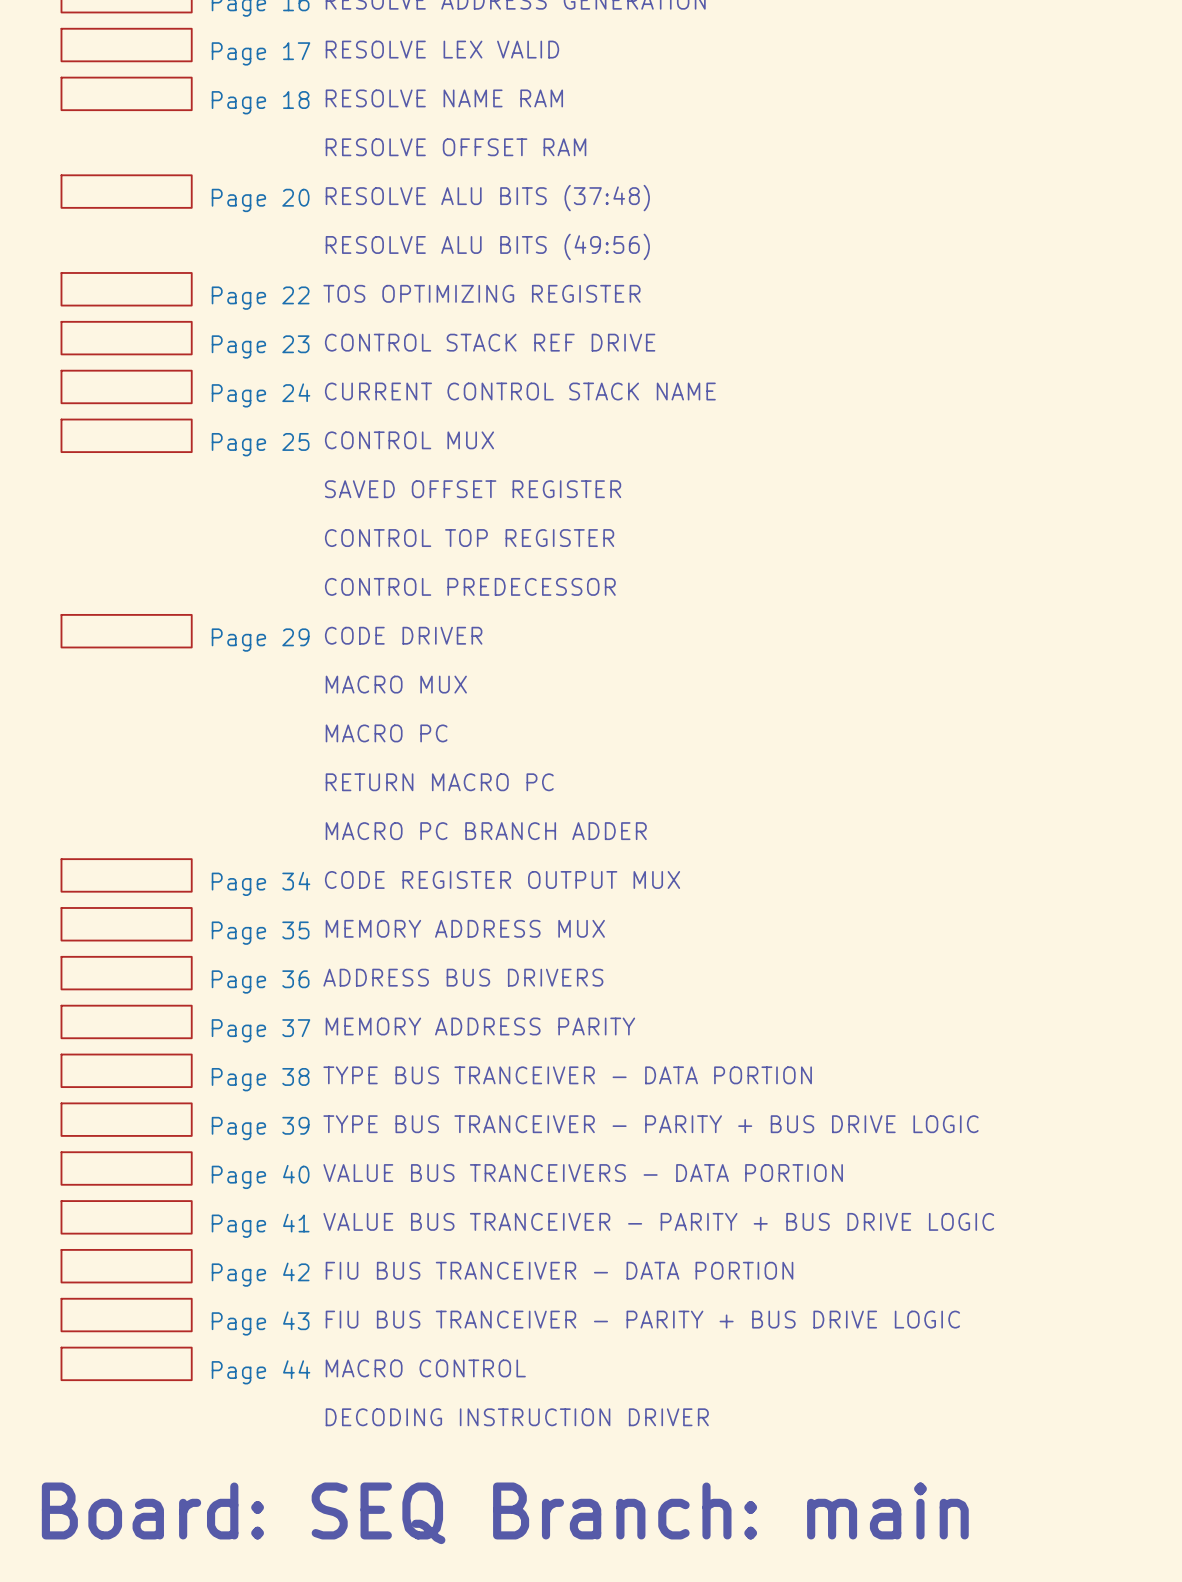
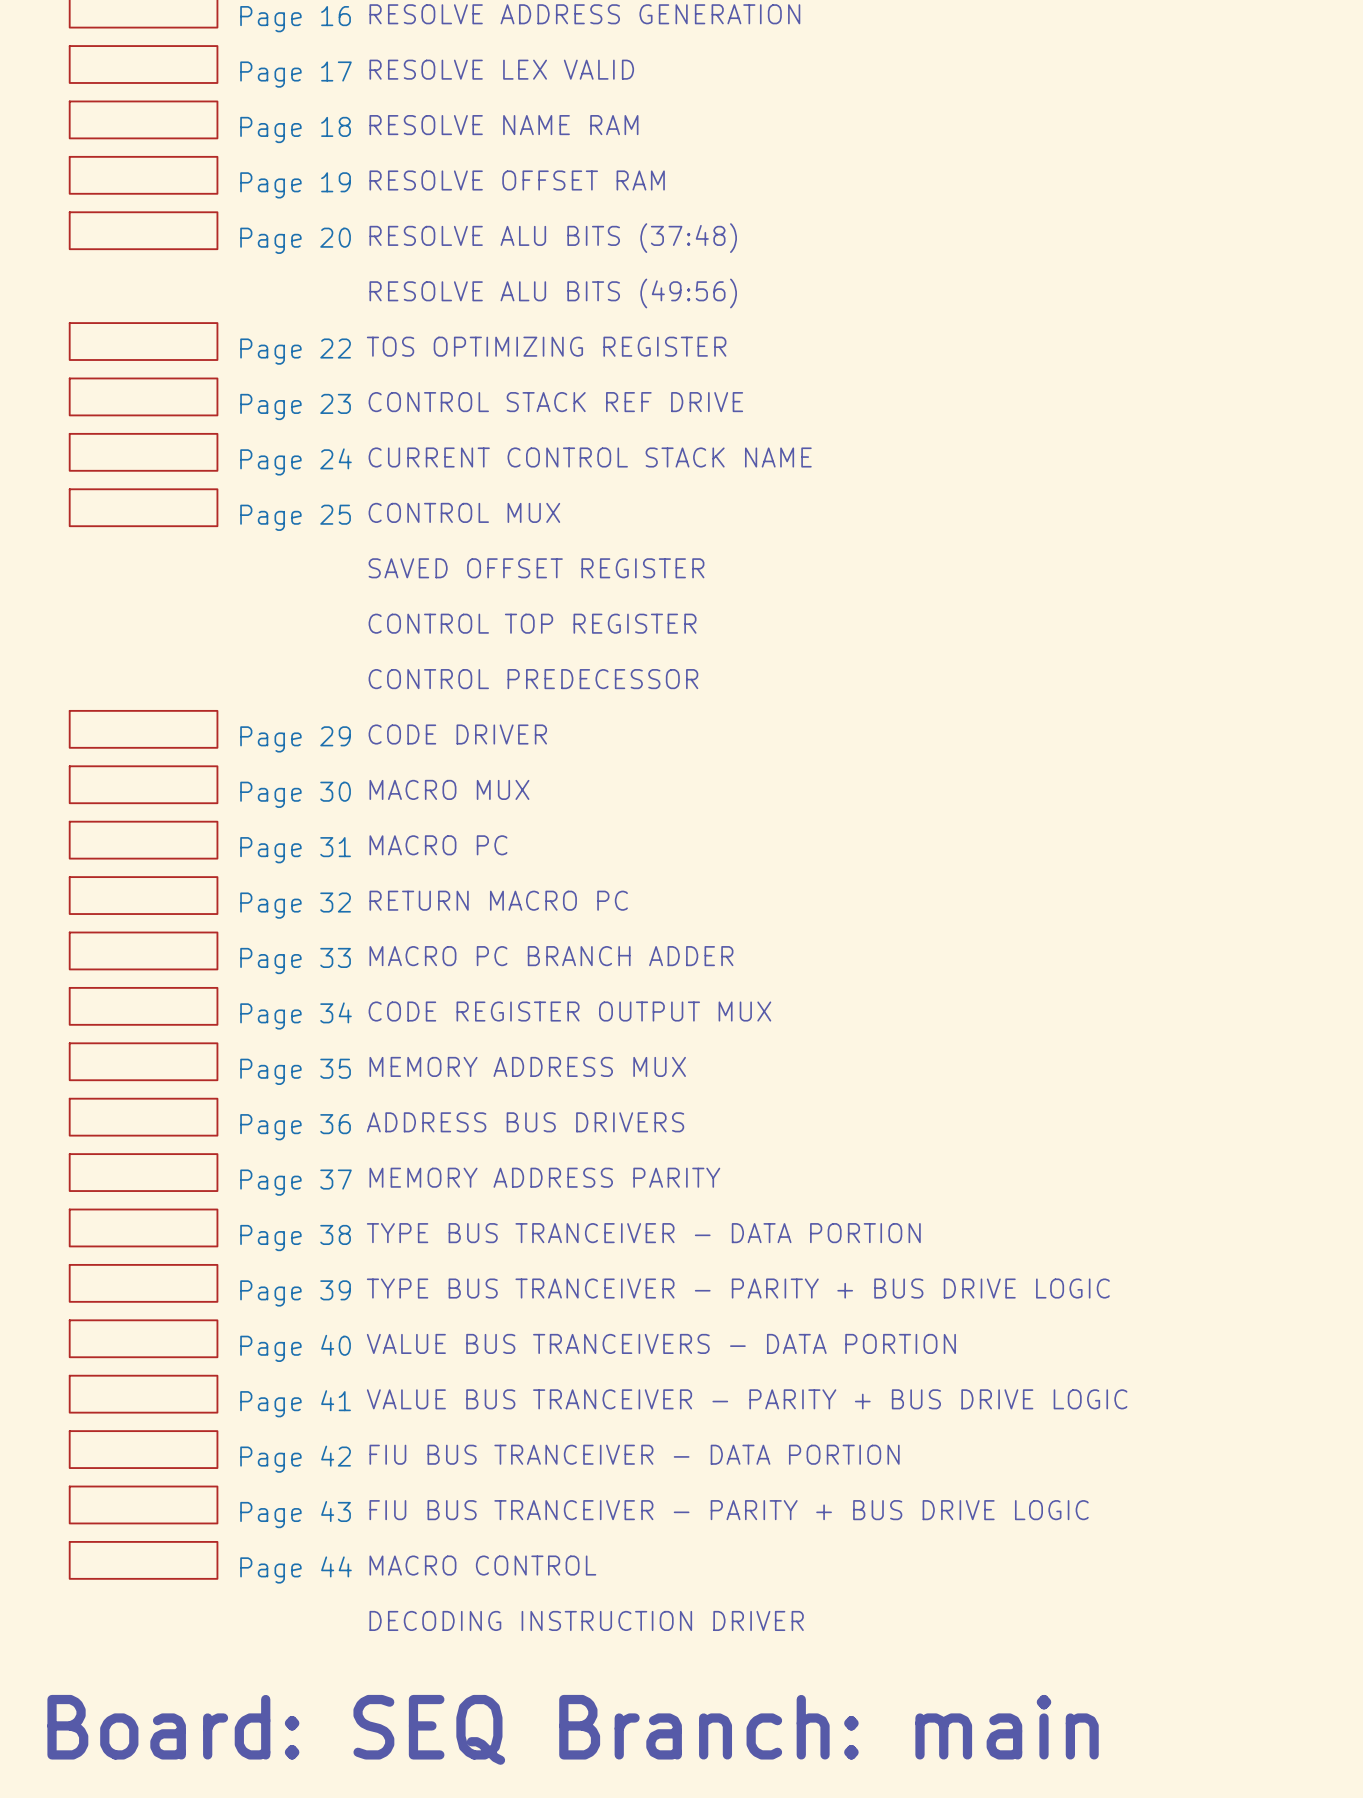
sheet Page 19: none -> (143, 175)
sheet Page 30: none -> (143, 784)
sheet Page 31: none -> (143, 840)
sheet Page 32: none -> (143, 895)
sheet Page 33: none -> (143, 950)

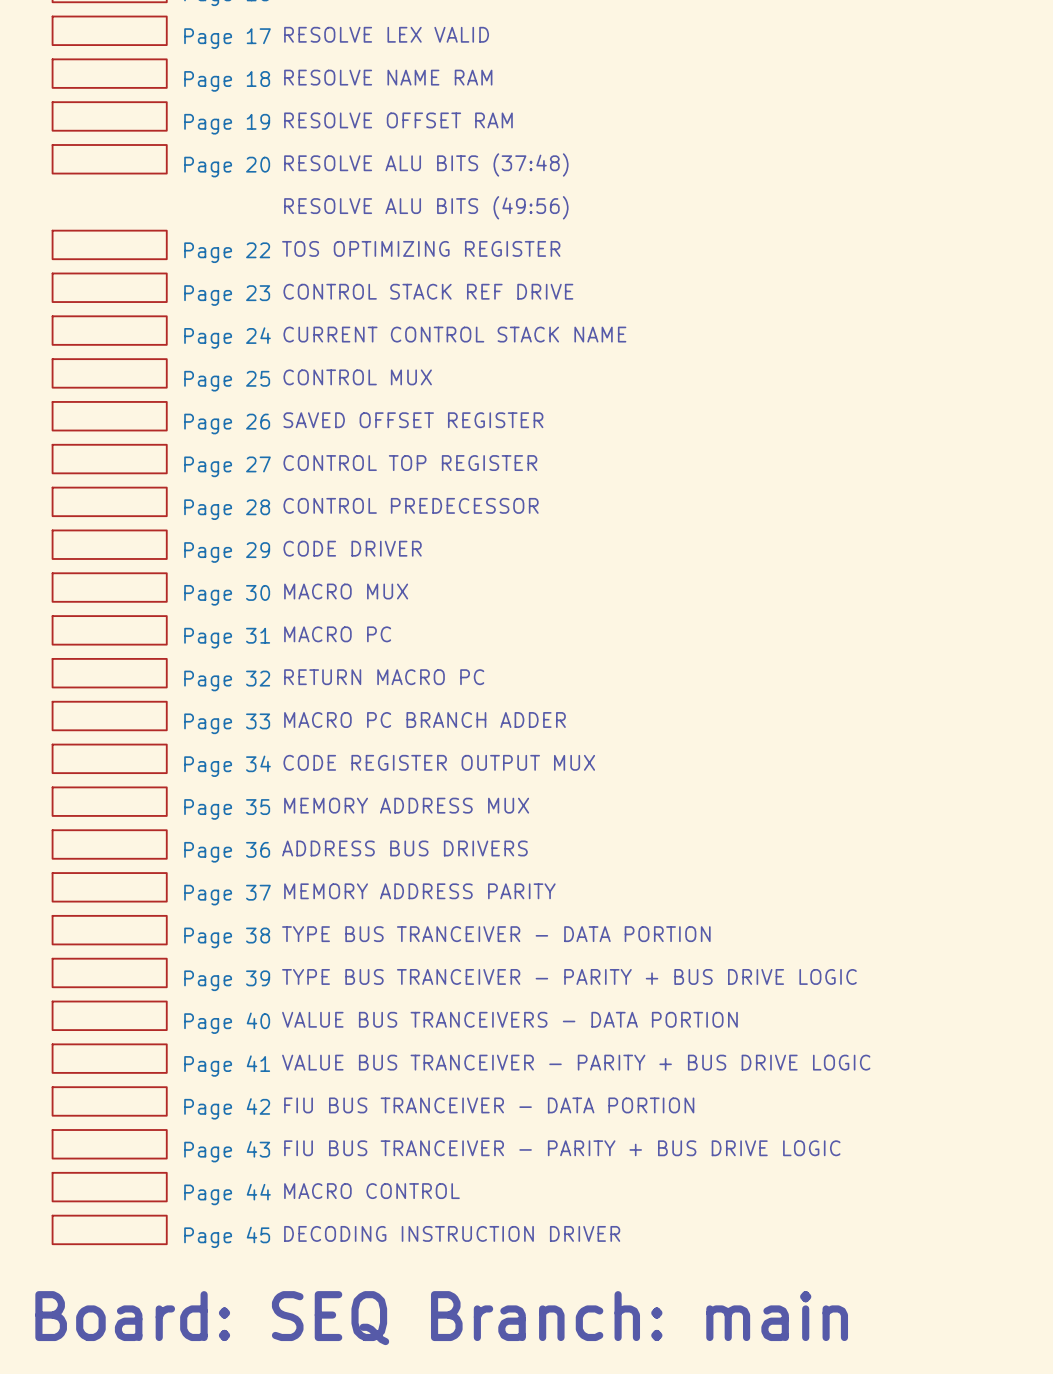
sheet Page 26: none -> (109, 416)
sheet Page 27: none -> (109, 459)
sheet Page 28: none -> (109, 501)
sheet Page 45: none -> (109, 1229)

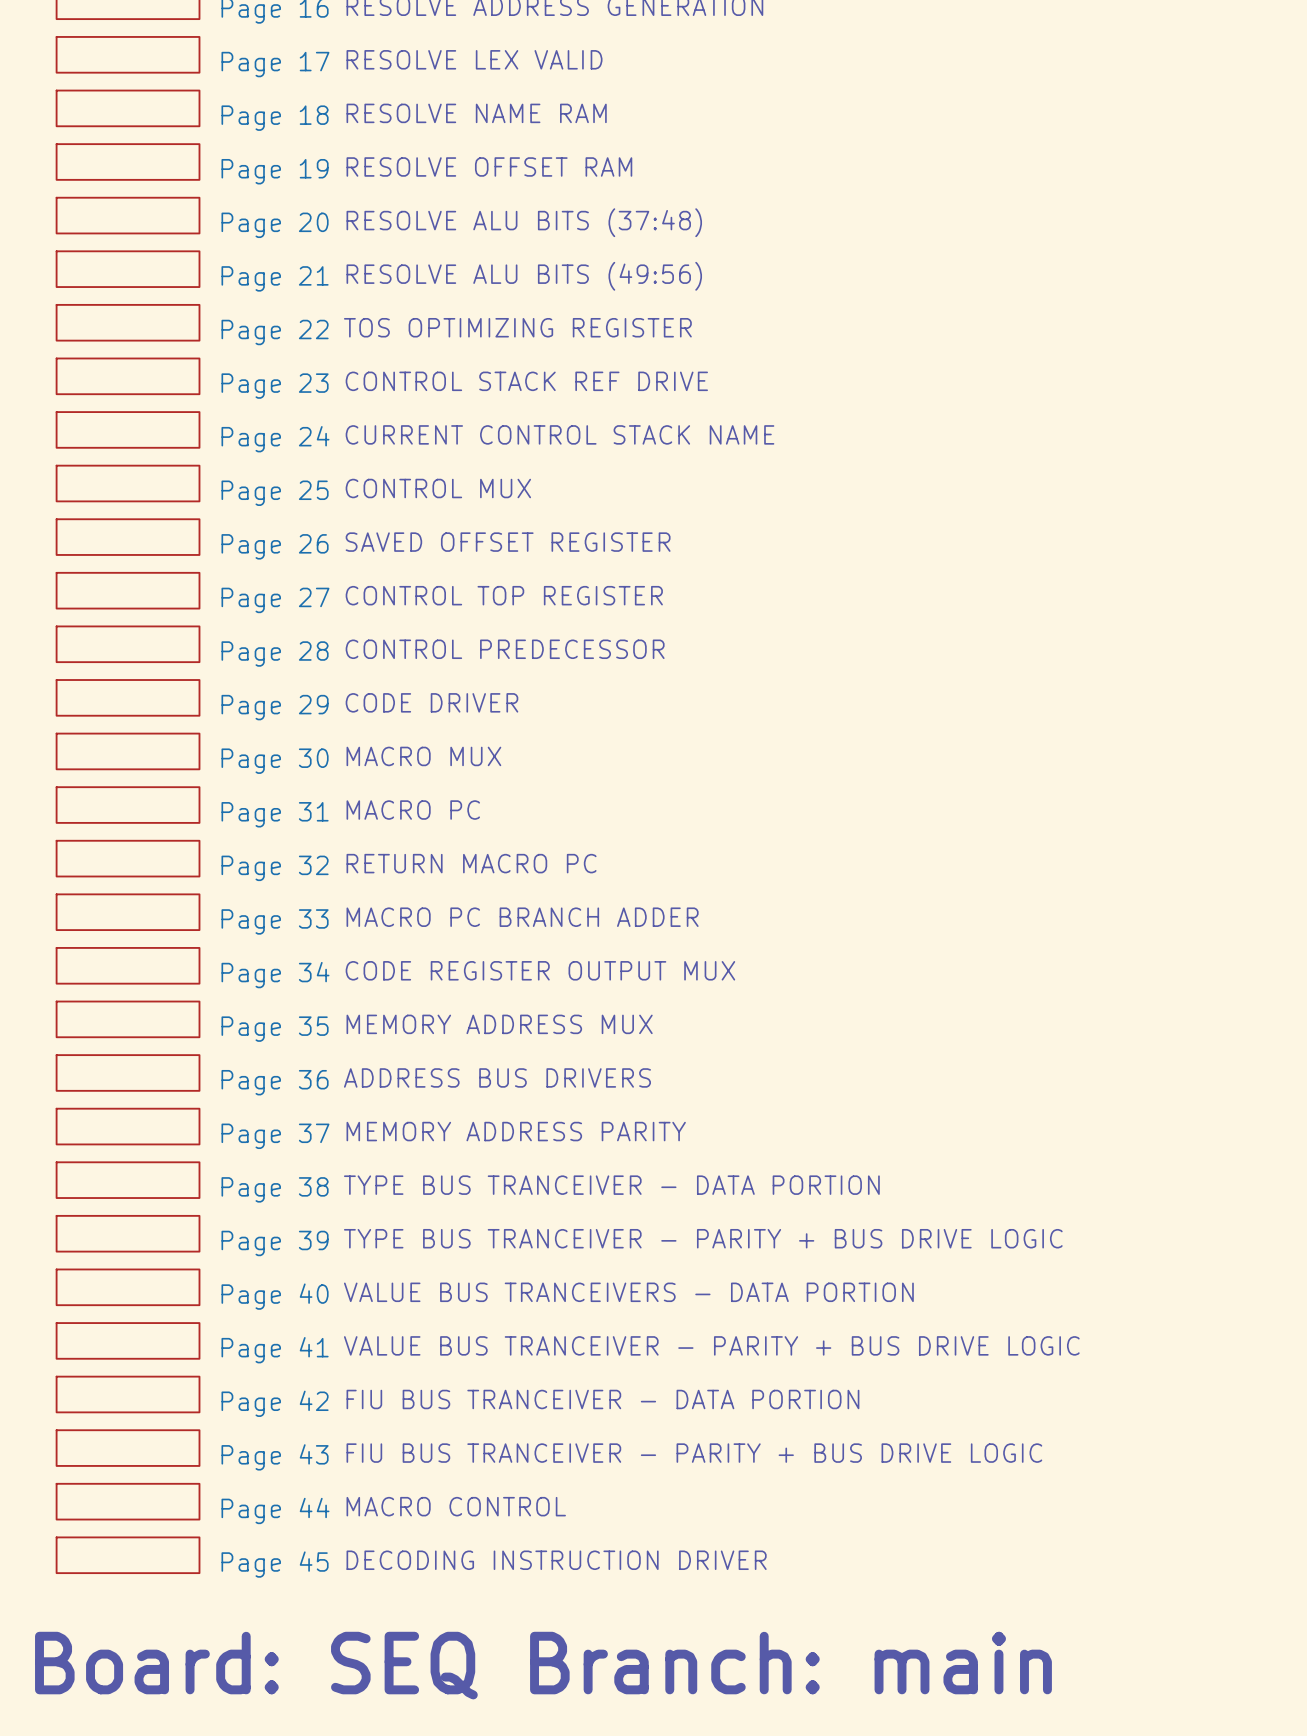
sheet Page 21: none -> (128, 269)

